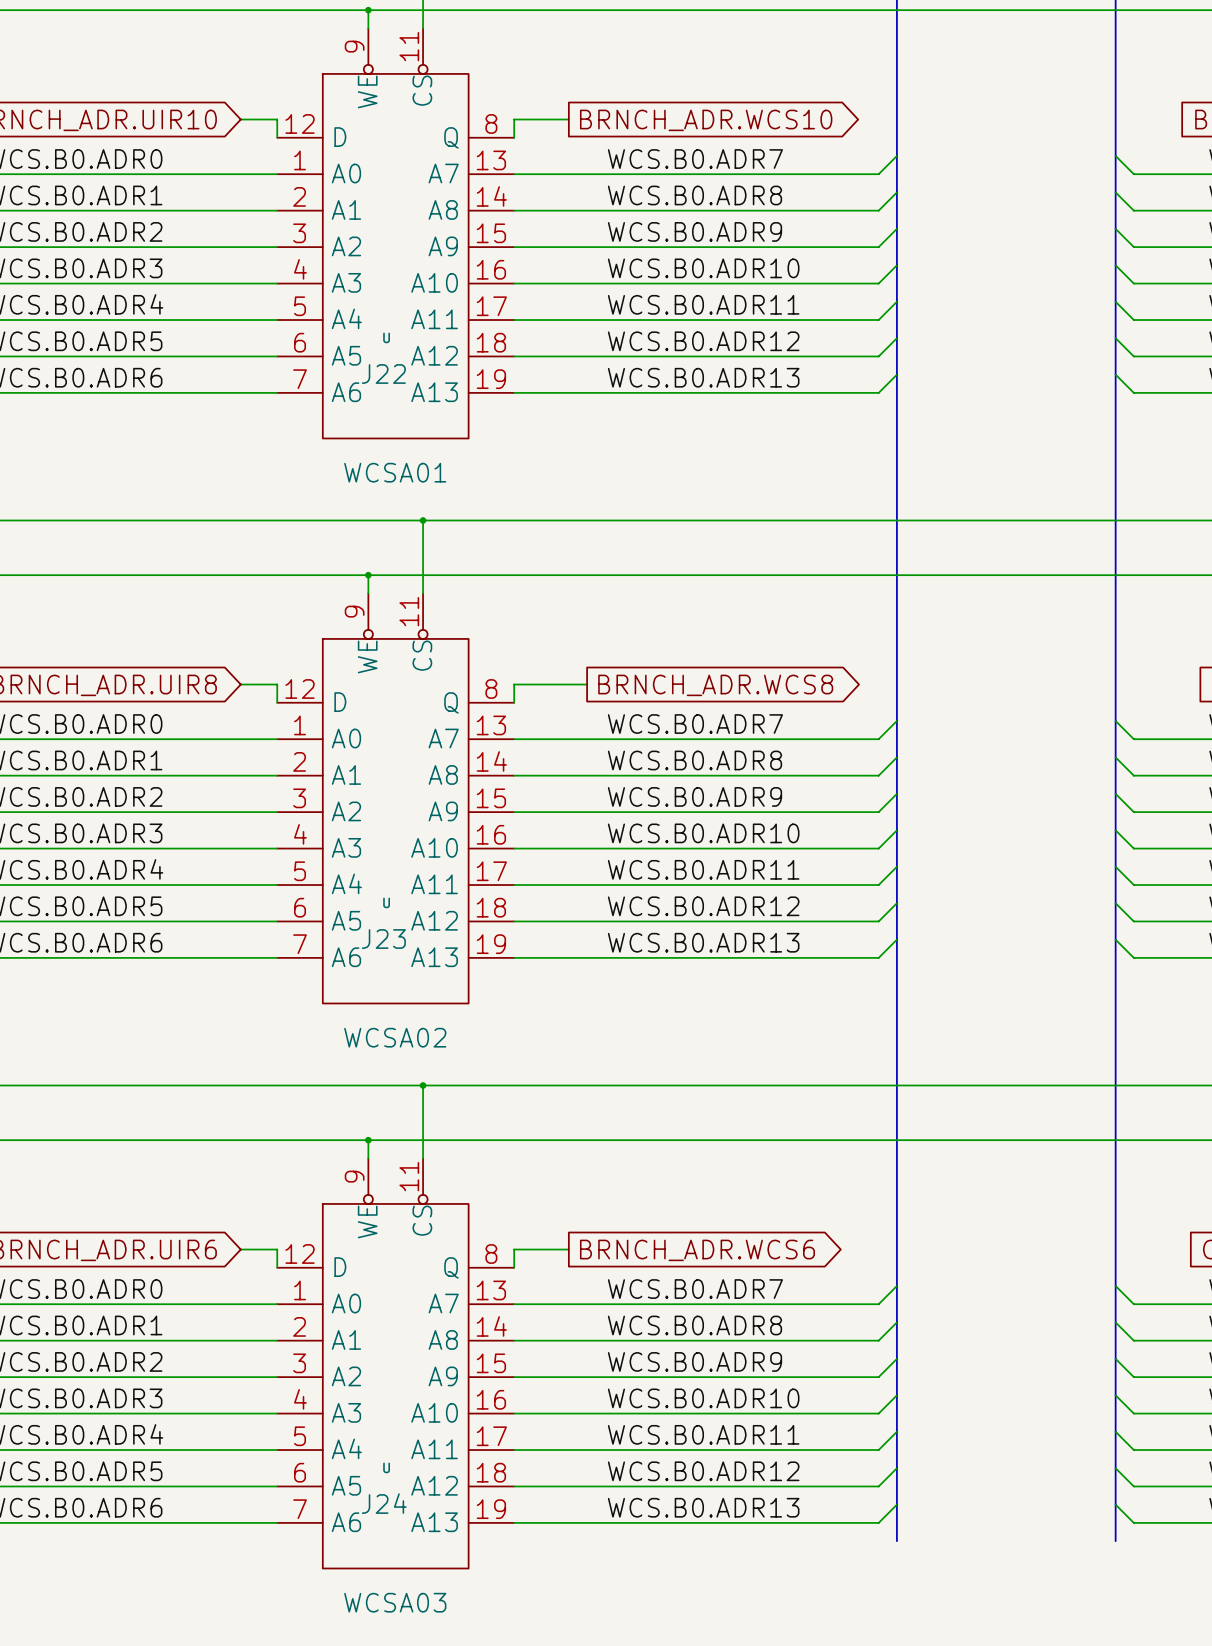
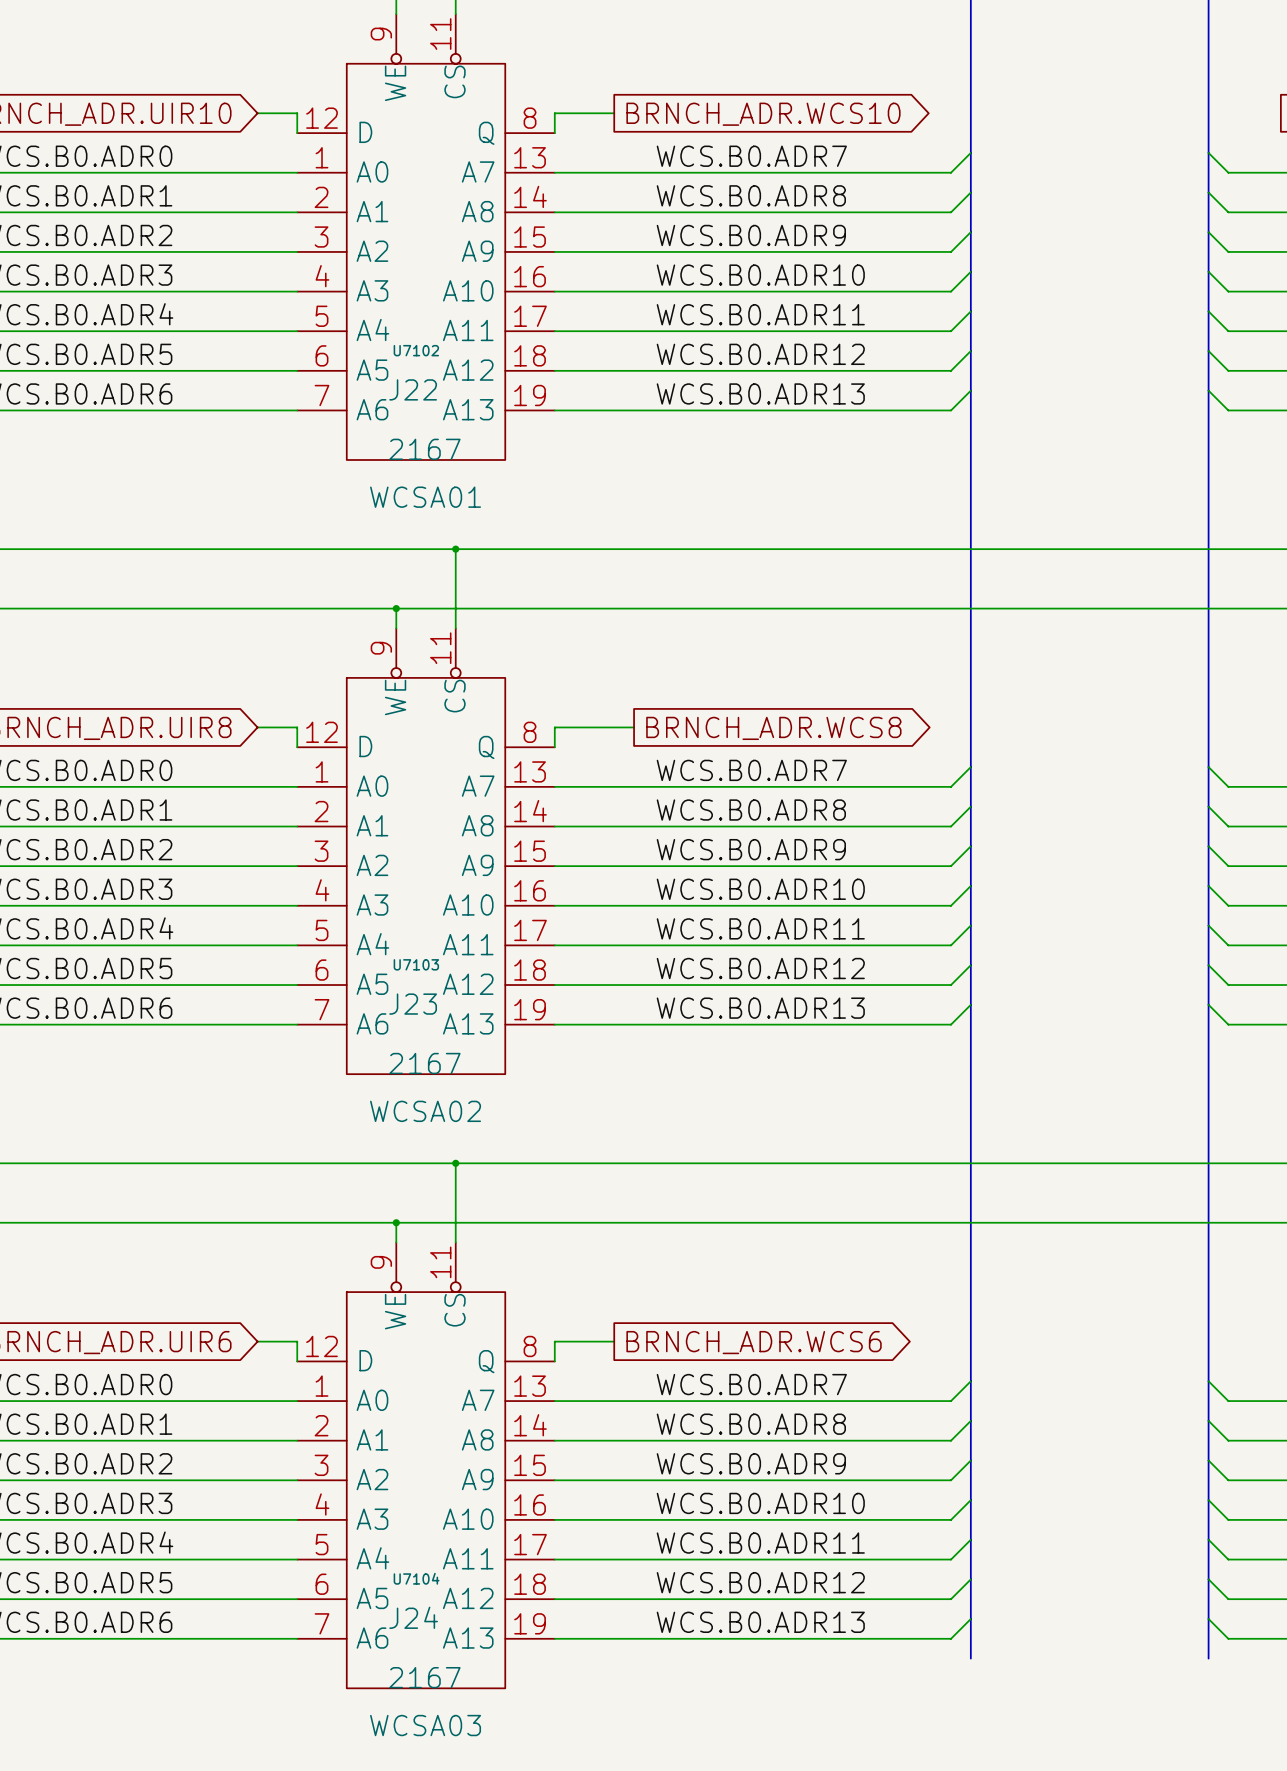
U name: U (386, 337) -> U7102 (416, 350)
U value: none -> 2167 (424, 449)
U name: U (386, 902) -> U7103 (416, 964)
U value: none -> 2167 (424, 1063)
U name: U (386, 1467) -> U7104 (416, 1578)
U value: none -> 2167 (424, 1677)

